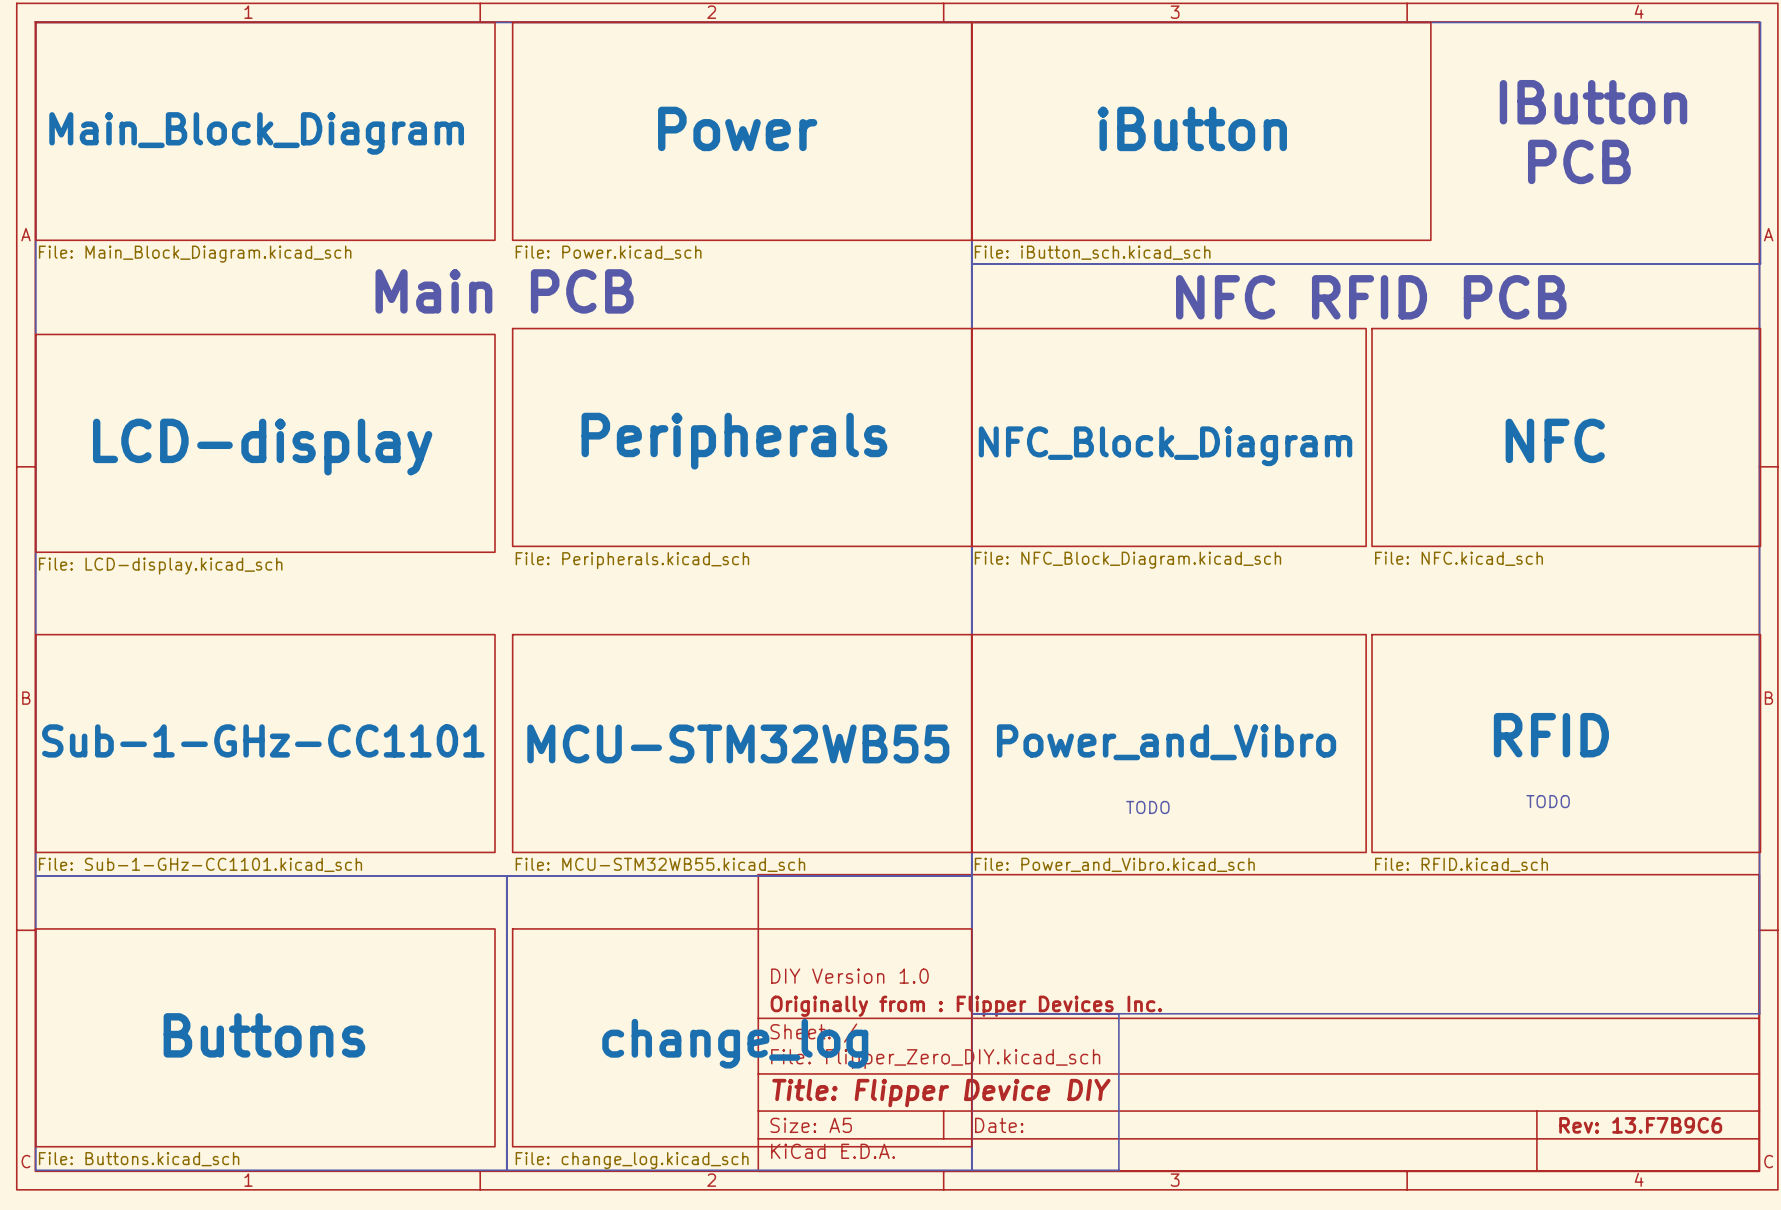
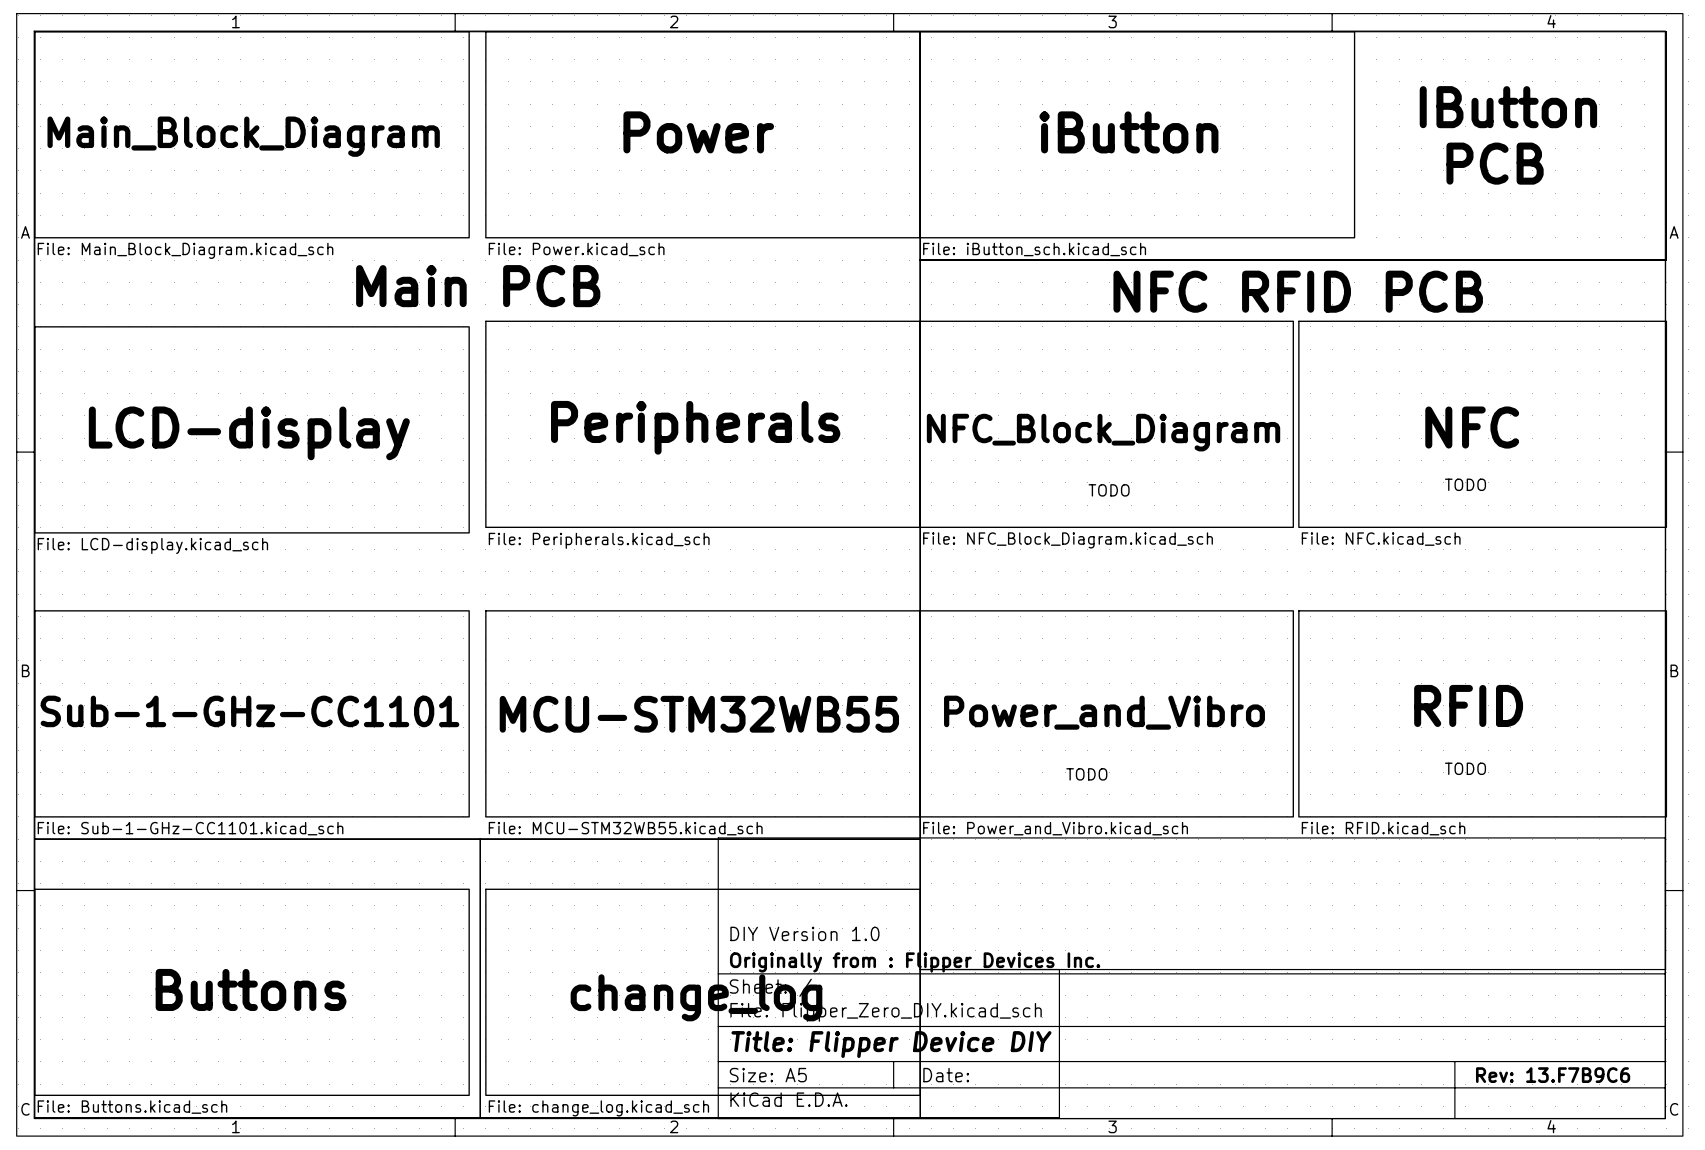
text: none -> TODO (1465, 484)
text: none -> TODO (1109, 490)

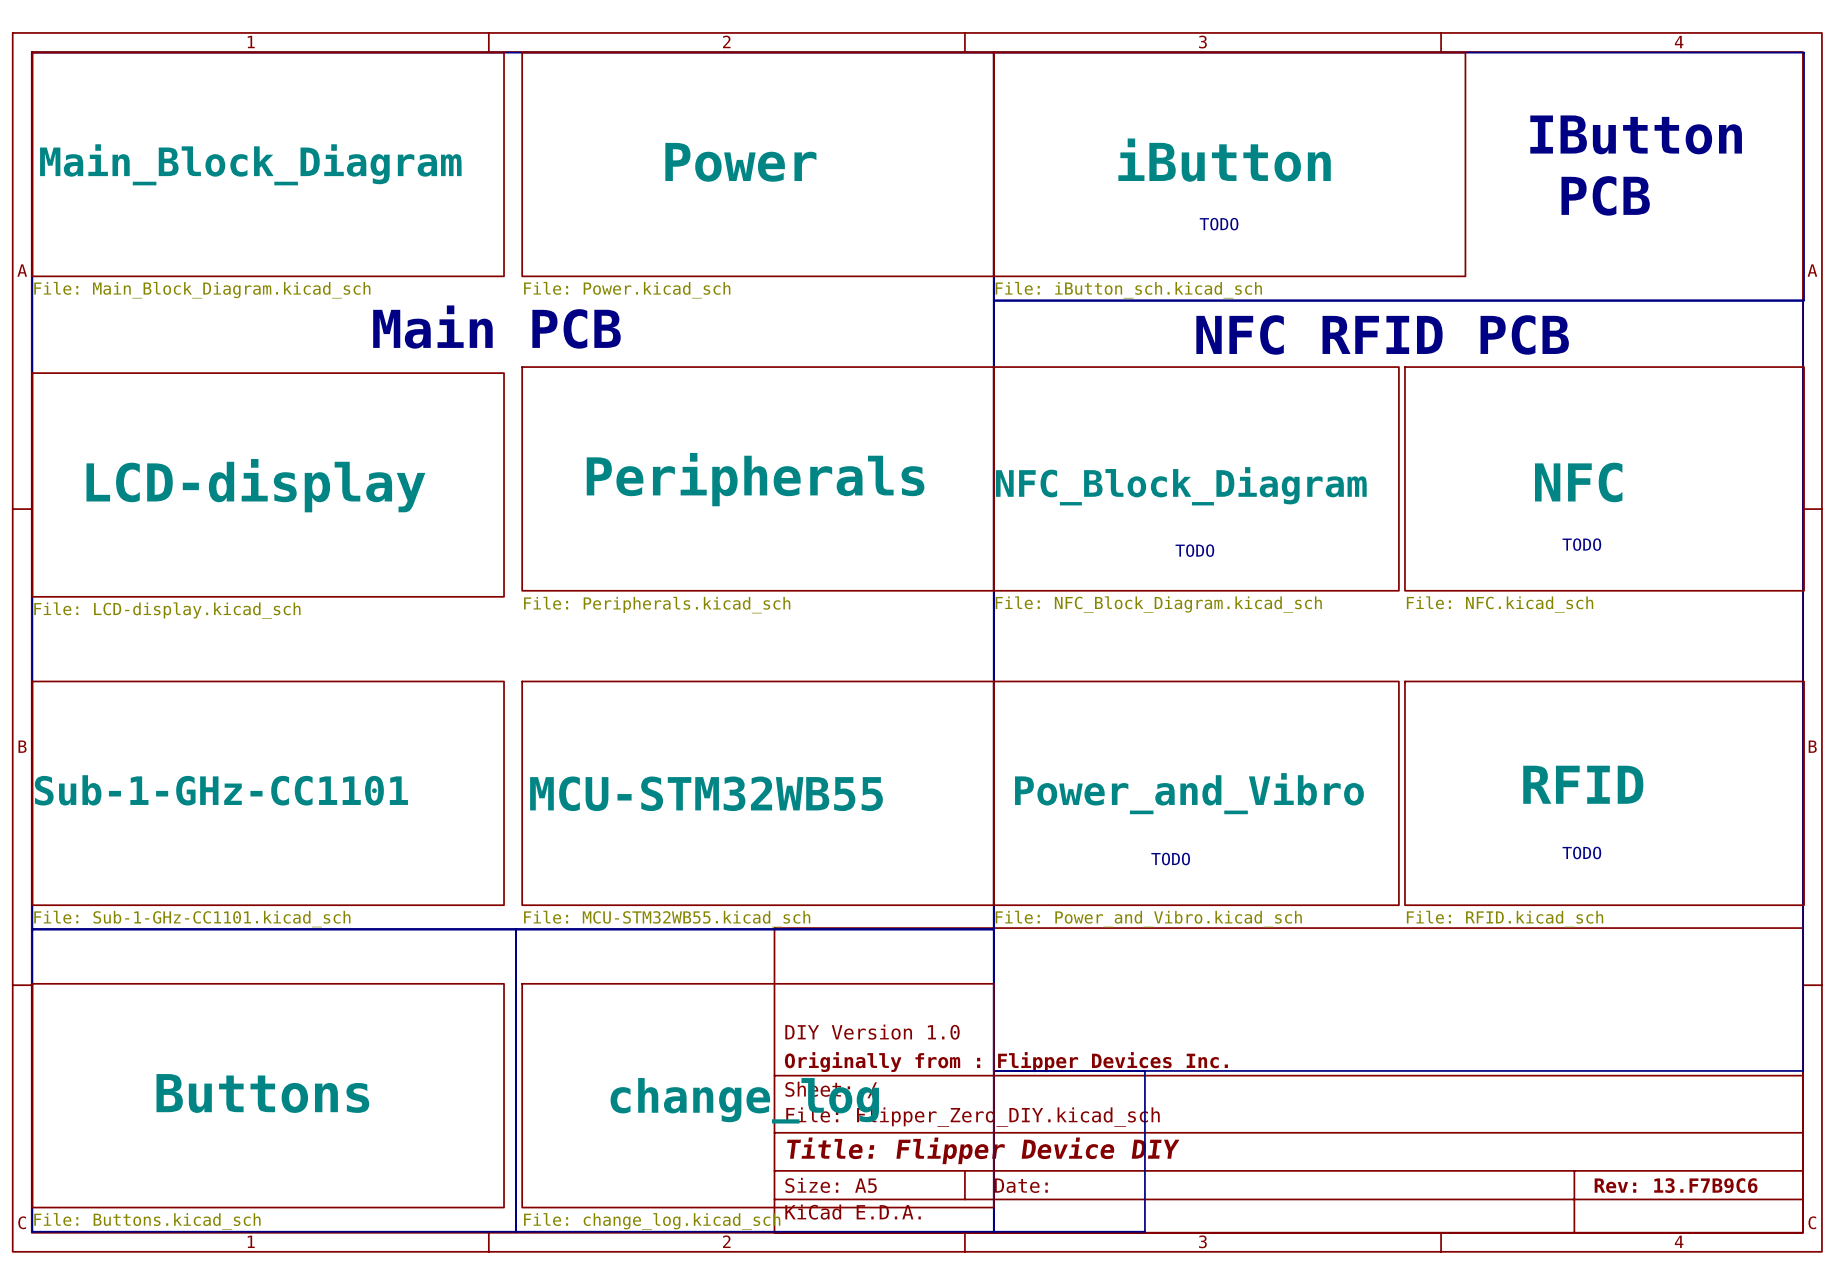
text: none -> TODO (1219, 224)

